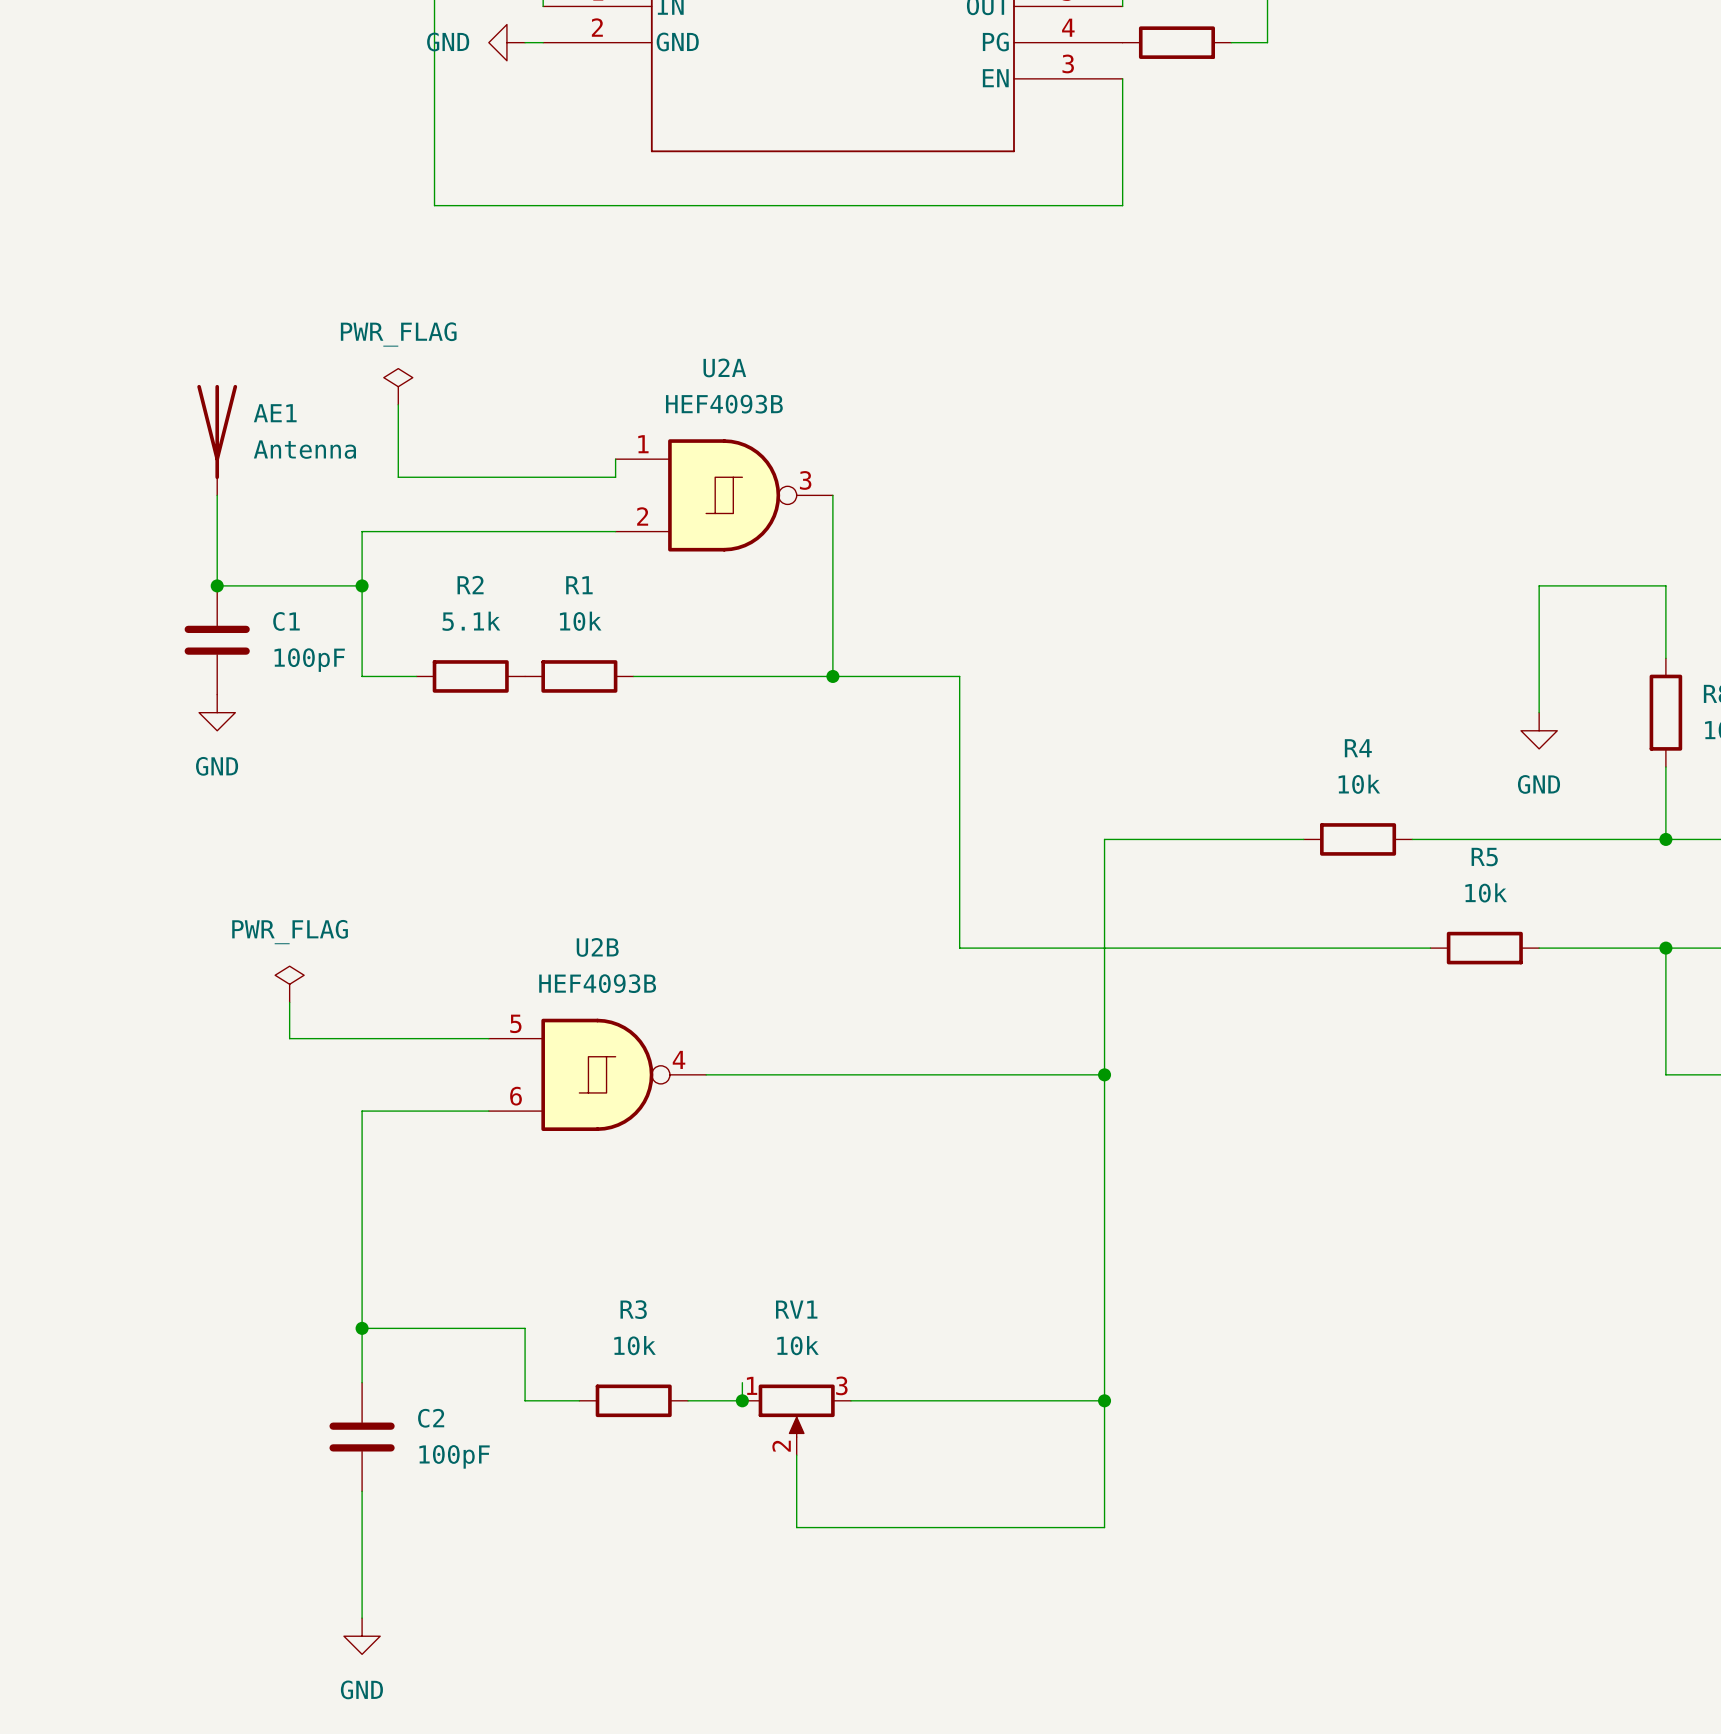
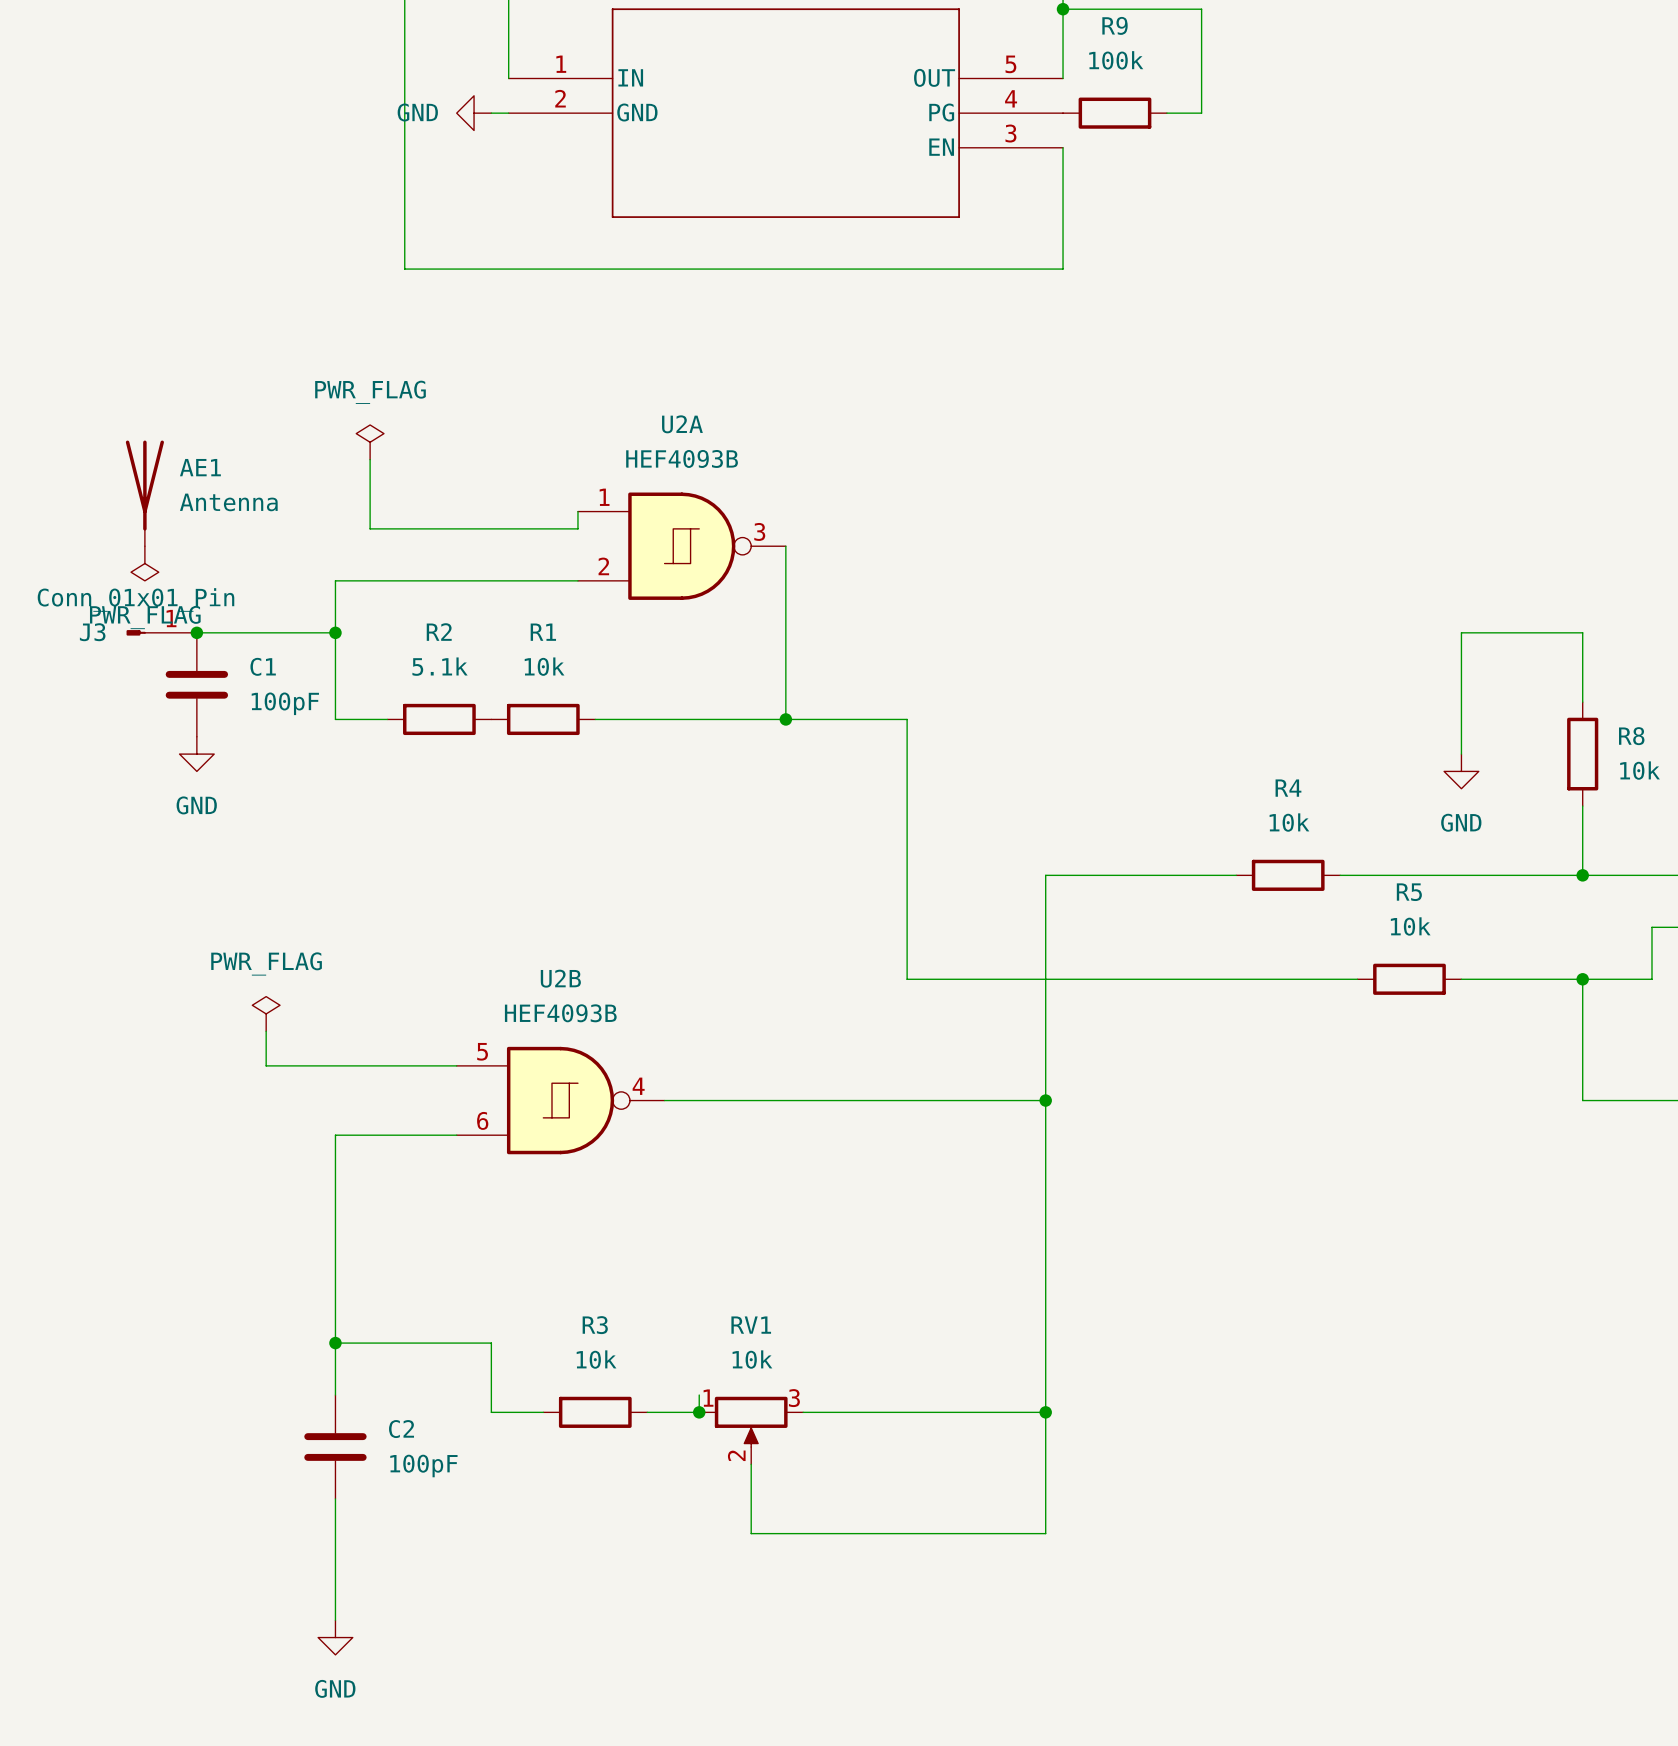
AE1 position: (217, 440) -> (144, 493)
wire: (217, 495) (217, 585) -> none
power symbol: none -> PWR_FLAG (144, 563)
J3: none -> Conn_01x01_Pin (161, 632)

